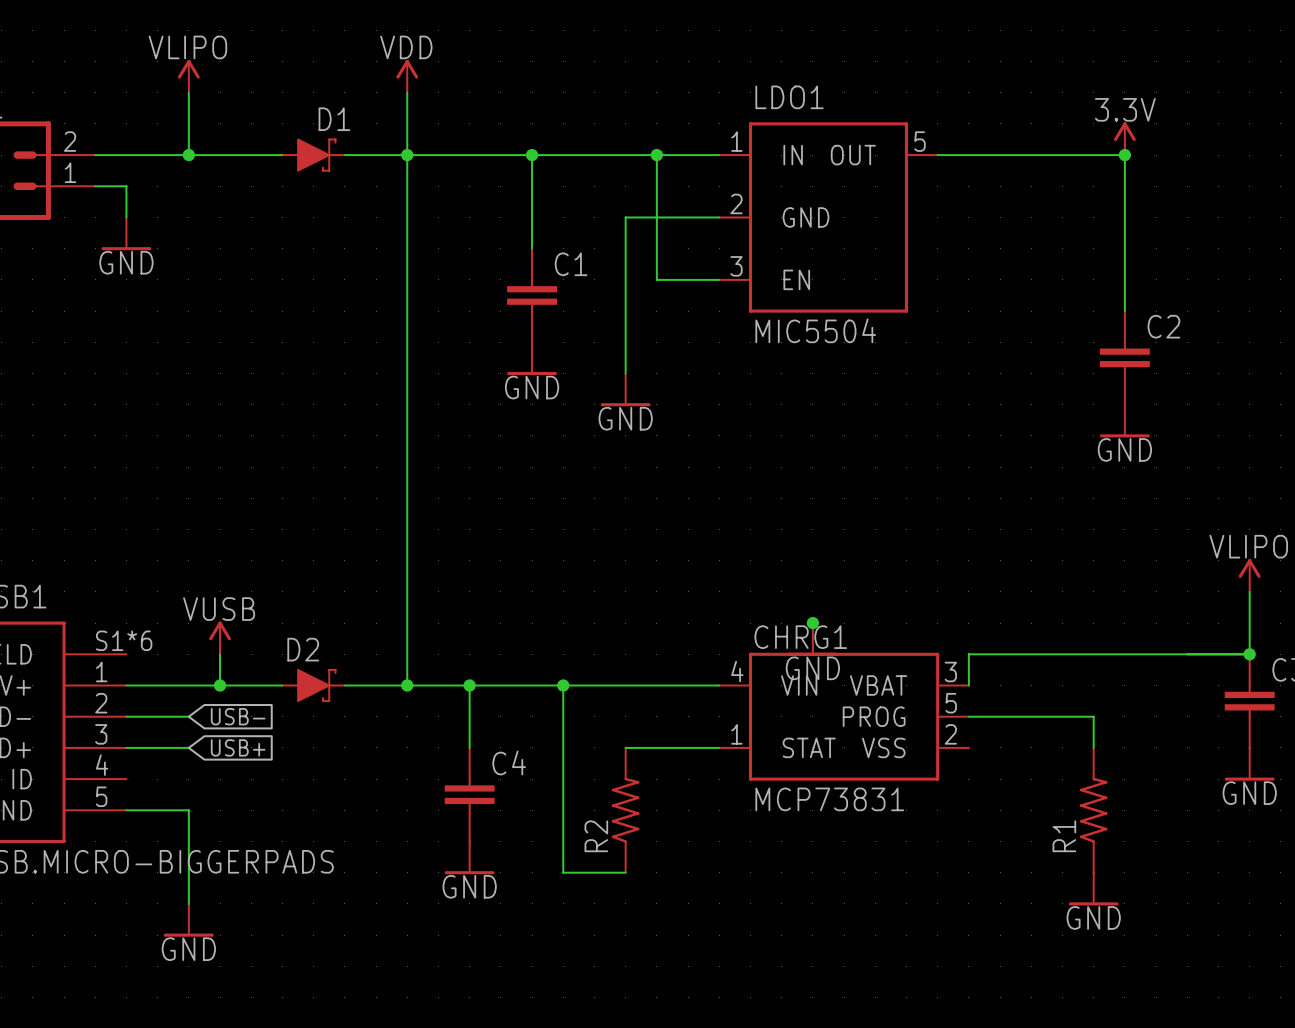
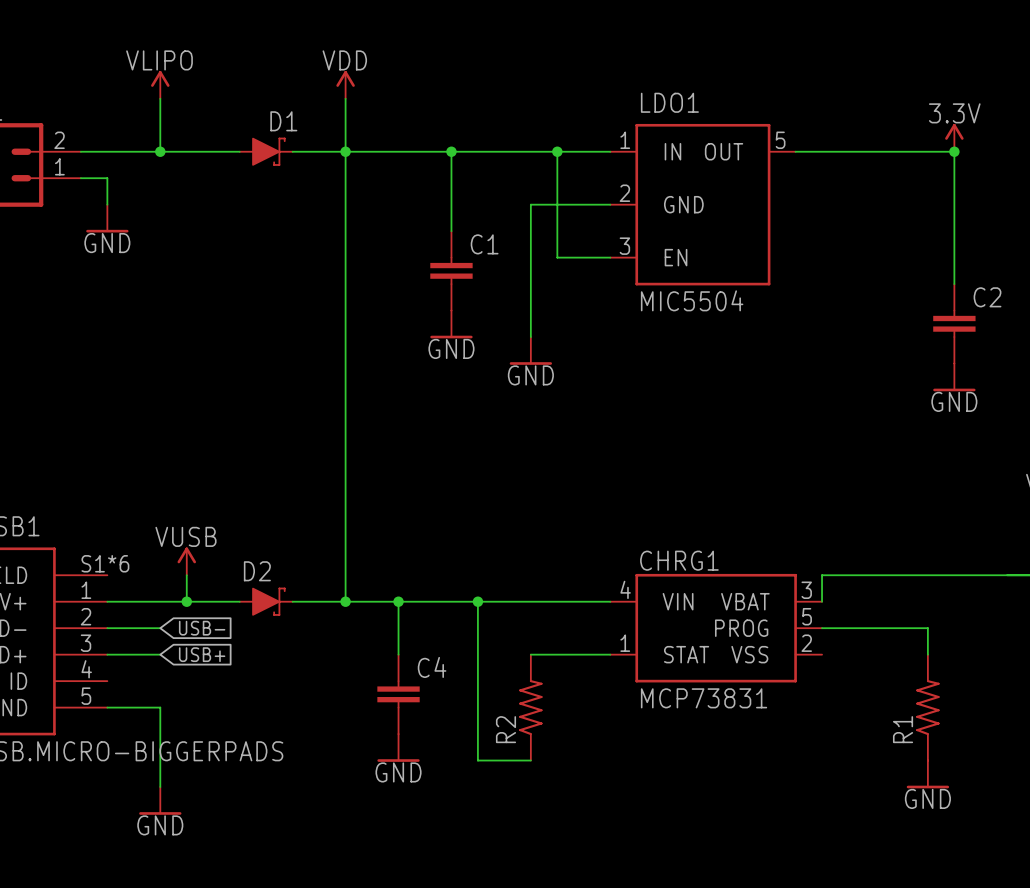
junction: (812, 623) -> none
power symbol: GND (812, 639) -> none

